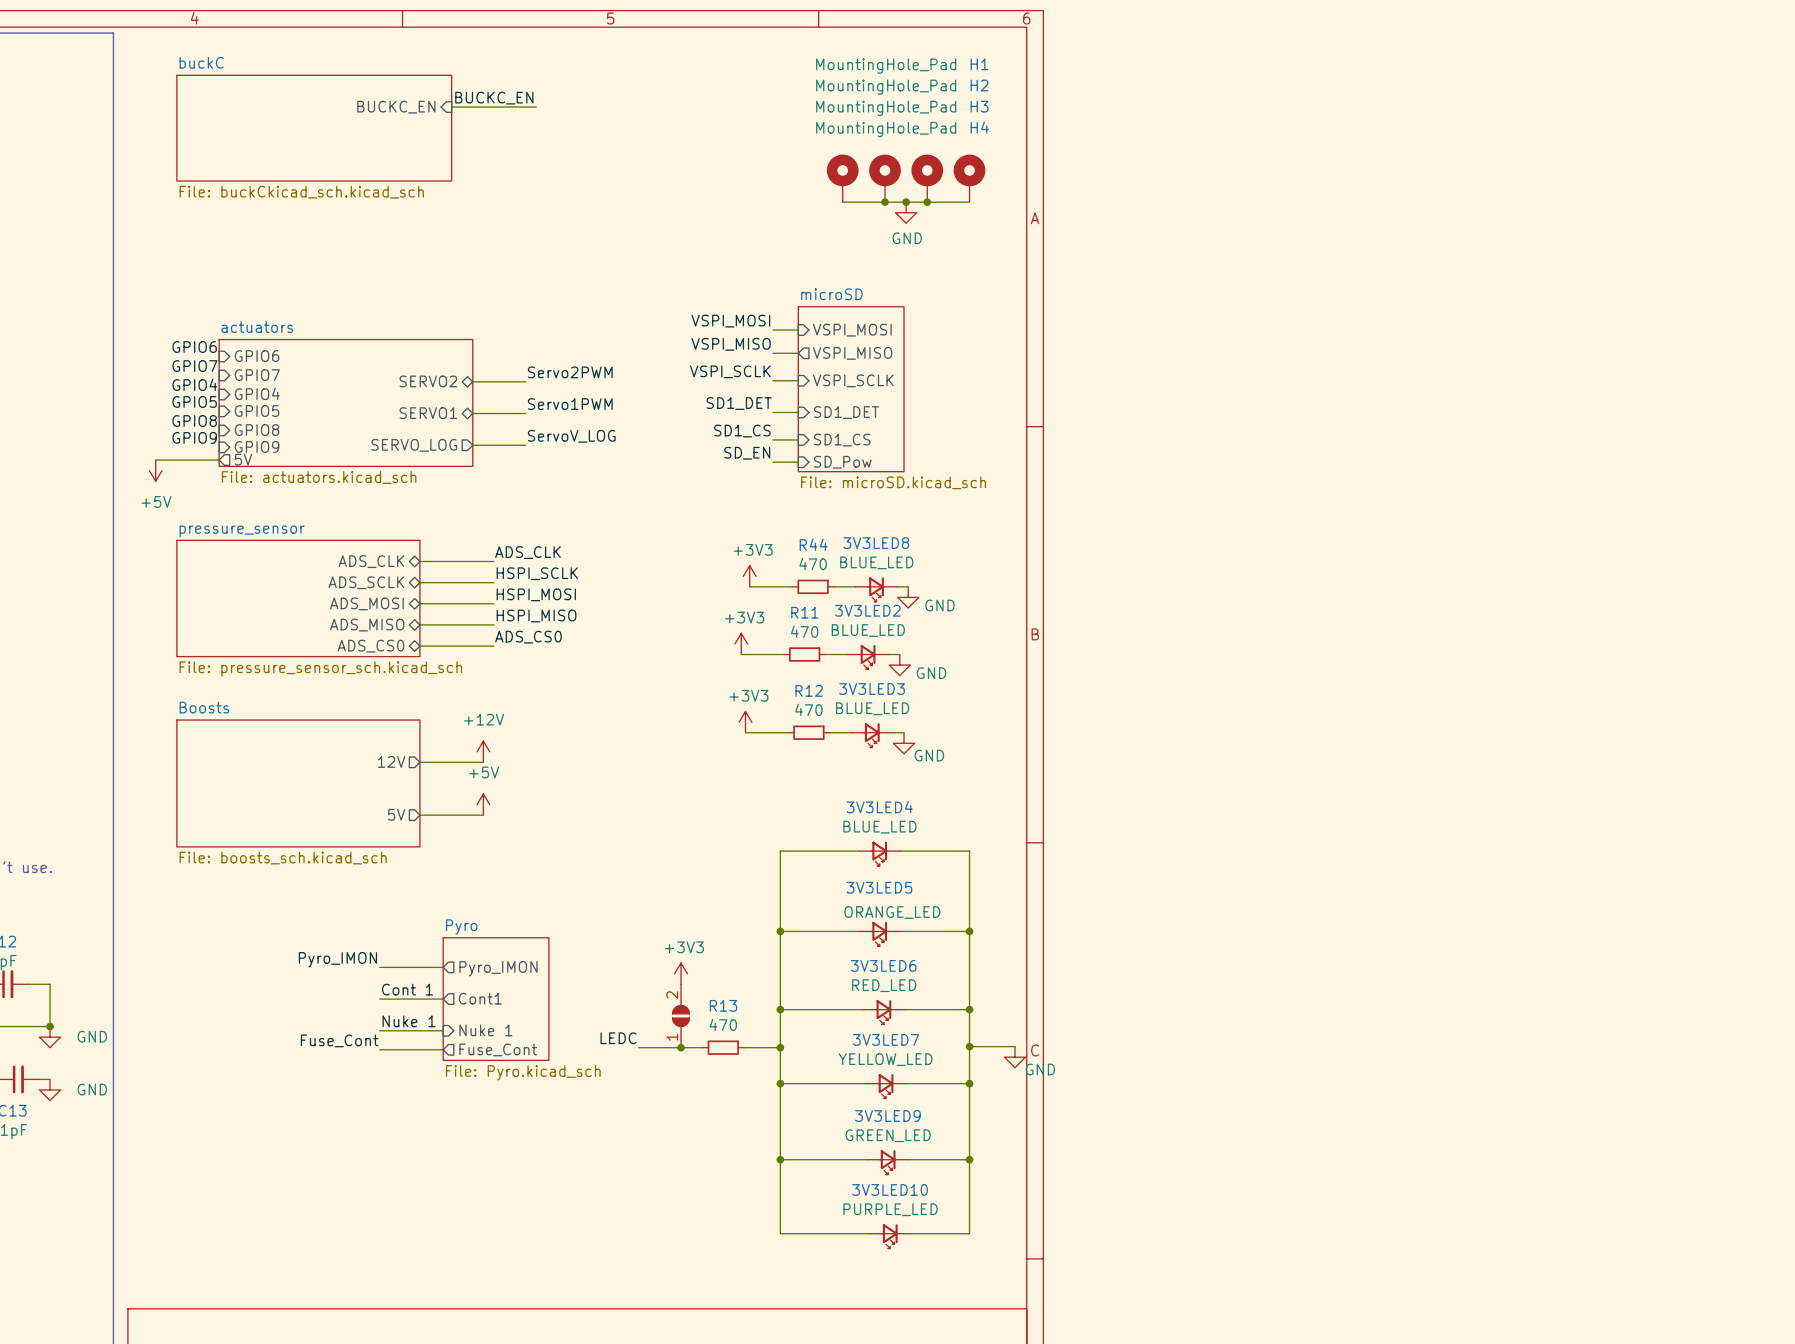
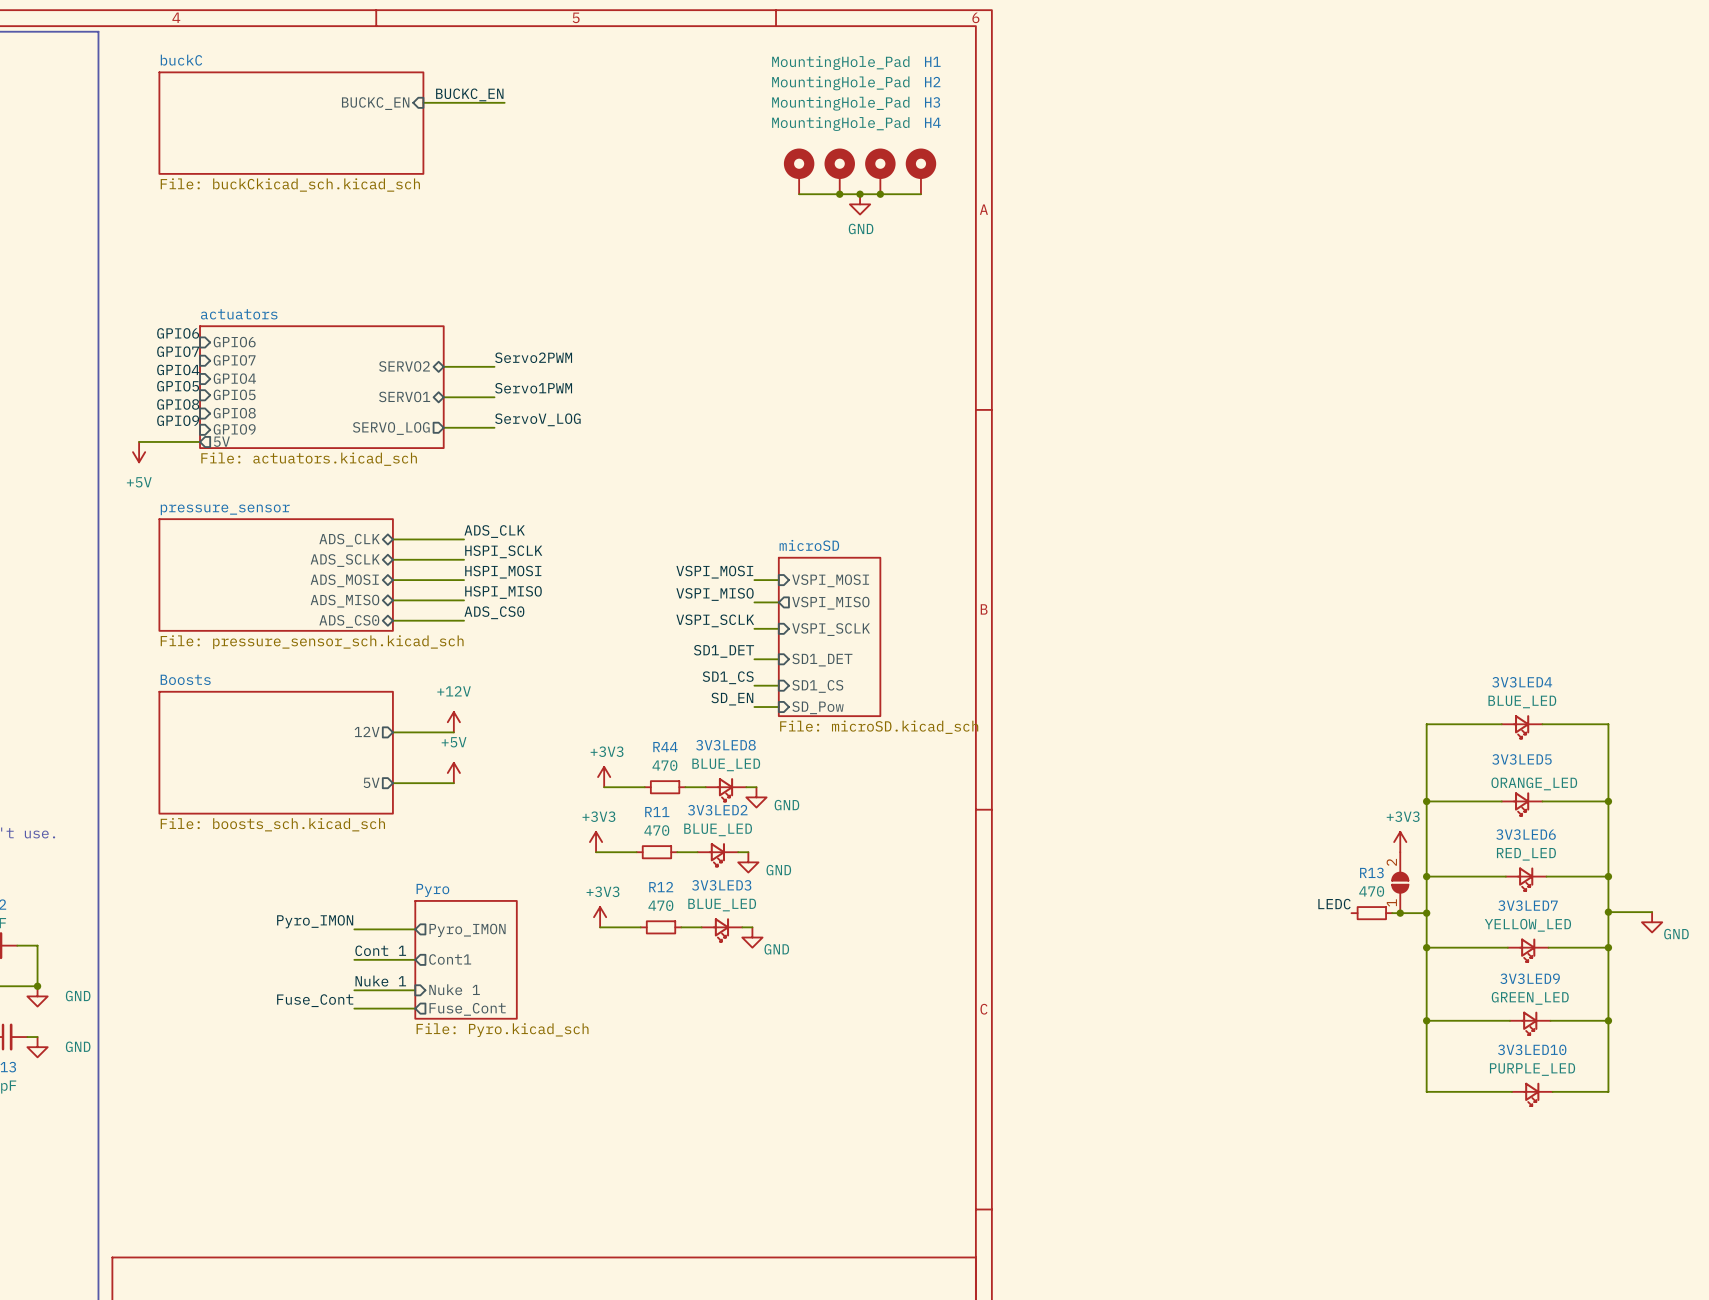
label: VSPI_MOSI (730, 321) -> none
wire: (772, 330) (798, 330) -> none
sheet pin: VSPI_MOSI (852, 330) -> none
label: VSPI_MISO (731, 344) -> none
wire: (772, 353) (798, 353) -> none
sheet pin: VSPI_MISO (852, 353) -> none
label: VSPI_SCLK (730, 371) -> none
wire: (772, 380) (798, 380) -> none
sheet pin: VSPI_SCLK (853, 380) -> none
sheet microSD: File: microSD.kicad_sch (851, 389) -> none
label: SD1_DET (739, 403) -> none
wire: (772, 412) (798, 412) -> none
sheet pin: SD1_DET (846, 412) -> none
label: SD1_CS (742, 431) -> none
wire: (772, 439) (798, 439) -> (754, 602) (778, 602)
sheet pin: SD1_CS (842, 440) -> none
label: SD_EN (747, 453) -> none
wire: (772, 462) (798, 462) -> (754, 580) (778, 580)
sheet pin: SD_Pow (842, 462) -> none
power symbol: +3V3 (749, 576) -> none
wire: (749, 586) (791, 586) -> none
R44 position: (813, 586) -> (665, 787)
wire: (834, 586) (855, 586) -> none
wire: (897, 586) (908, 586) -> none
3V3LED8 position: (876, 589) -> (726, 789)
label: none -> VSPI_MOSI (714, 572)
power symbol: GND (908, 597) -> none
sheet pin: none -> VSPI_MOSI (830, 580)
label: none -> VSPI_MISO (715, 594)
sheet pin: none -> VSPI_MISO (830, 603)
power symbol: +3V3 (741, 643) -> none
label: none -> VSPI_SCLK (715, 620)
wire: (741, 654) (783, 654) -> none
wire: none -> (754, 628) (778, 628)
R11 position: (804, 654) -> (656, 852)
wire: (825, 654) (846, 654) -> none
sheet pin: none -> VSPI_SCLK (831, 629)
wire: (889, 654) (899, 654) -> none
3V3LED2 position: (868, 657) -> (717, 854)
sheet microSD: none -> File: microSD.kicad_sch (829, 636)
power symbol: GND (899, 665) -> none
label: none -> SD1_DET (724, 651)
wire: none -> (754, 659) (778, 659)
sheet pin: none -> SD1_DET (822, 660)
label: none -> SD1_CS (728, 677)
wire: none -> (754, 685) (778, 685)
sheet pin: none -> SD1_CS (817, 686)
power symbol: +3V3 (745, 722) -> none
label: none -> SD_EN (732, 699)
wire: (745, 732) (787, 732) -> (604, 787) (644, 787)
R12 position: (808, 732) -> (661, 927)
wire: (830, 732) (851, 732) -> (685, 787) (705, 787)
wire: (893, 732) (904, 732) -> (746, 787) (756, 787)
wire: none -> (754, 707) (778, 707)
3V3LED3 position: (872, 735) -> (721, 929)
sheet pin: none -> SD_Pow (818, 707)
power symbol: GND (904, 743) -> none
wire: none -> (1501, 724) (1426, 724) (1426, 1091) (1511, 1091)
wire: none -> (1542, 724) (1608, 724) (1608, 1091) (1552, 1091)
power symbol: none -> +3V3 (604, 777)
power symbol: none -> GND (756, 797)
wire: none -> (1426, 801) (1501, 801)
junction: none -> (1426, 801)
wire: none -> (1542, 801) (1608, 801)
junction: none -> (1608, 801)
wire: (858, 851) (780, 851) (780, 1233) (869, 1233) -> none
wire: (900, 851) (969, 851) (969, 1233) (911, 1233) -> none
3V3LED4 position: (879, 853) -> (1522, 726)
power symbol: none -> +3V3 (596, 842)
power symbol: none -> +3V3 (1400, 842)
wire: none -> (596, 852) (636, 852)
wire: none -> (677, 852) (697, 852)
wire: none -> (738, 852) (748, 852)
power symbol: none -> GND (748, 862)
wire: none -> (1426, 876) (1505, 876)
junction: none -> (1426, 876)
wire: none -> (1546, 876) (1608, 876)
junction: none -> (1608, 876)
part: none -> (1400, 882)
wire: (780, 931) (858, 931) -> none
junction: (780, 931) -> none
wire: (900, 931) (969, 931) -> none
junction: (969, 931) -> none
3V3LED5 position: (879, 934) -> (1522, 803)
label: none -> LEDC (1334, 904)
wire: none -> (1608, 912) (1652, 912)
junction: none -> (1608, 912)
wire: none -> (1392, 913) (1426, 913)
junction: none -> (1400, 913)
junction: none -> (1426, 913)
power symbol: none -> GND (1652, 922)
wire: none -> (600, 927) (640, 927)
wire: none -> (681, 927) (701, 927)
wire: none -> (742, 927) (752, 927)
power symbol position: +3V3 (681, 973) -> +3V3 (600, 917)
power symbol: none -> GND (752, 937)
wire: none -> (1426, 947) (1507, 947)
junction: none -> (1426, 947)
wire: none -> (1548, 947) (1608, 947)
junction: none -> (1608, 947)
wire: (780, 1009) (862, 1009) -> none
junction: (780, 1009) -> none
wire: (905, 1009) (969, 1009) -> none
junction: (969, 1009) -> none
3V3LED6 position: (883, 1012) -> (1526, 879)
part: (681, 1015) -> none
label: LEDC (618, 1038) -> none
wire: (969, 1046) (1014, 1046) -> none
junction: (969, 1046) -> none
wire: (638, 1047) (702, 1047) -> none
junction: (681, 1047) -> none
R13 position: (723, 1047) -> (1371, 913)
wire: (744, 1047) (780, 1047) -> none
junction: (780, 1047) -> none
power symbol: GND (1014, 1057) -> none
wire: none -> (1426, 1020) (1509, 1020)
junction: none -> (1426, 1020)
wire: none -> (1550, 1020) (1608, 1020)
junction: none -> (1608, 1020)
wire: (780, 1083) (864, 1083) -> none
junction: (780, 1083) -> none
wire: (907, 1083) (969, 1083) -> none
junction: (969, 1083) -> none
3V3LED7 position: (886, 1086) -> (1528, 950)
wire: (780, 1159) (867, 1159) -> none
junction: (780, 1159) -> none
wire: (909, 1159) (969, 1159) -> none
junction: (969, 1159) -> none
3V3LED9 position: (888, 1162) -> (1530, 1023)
3V3LED10 position: (890, 1236) -> (1532, 1094)

